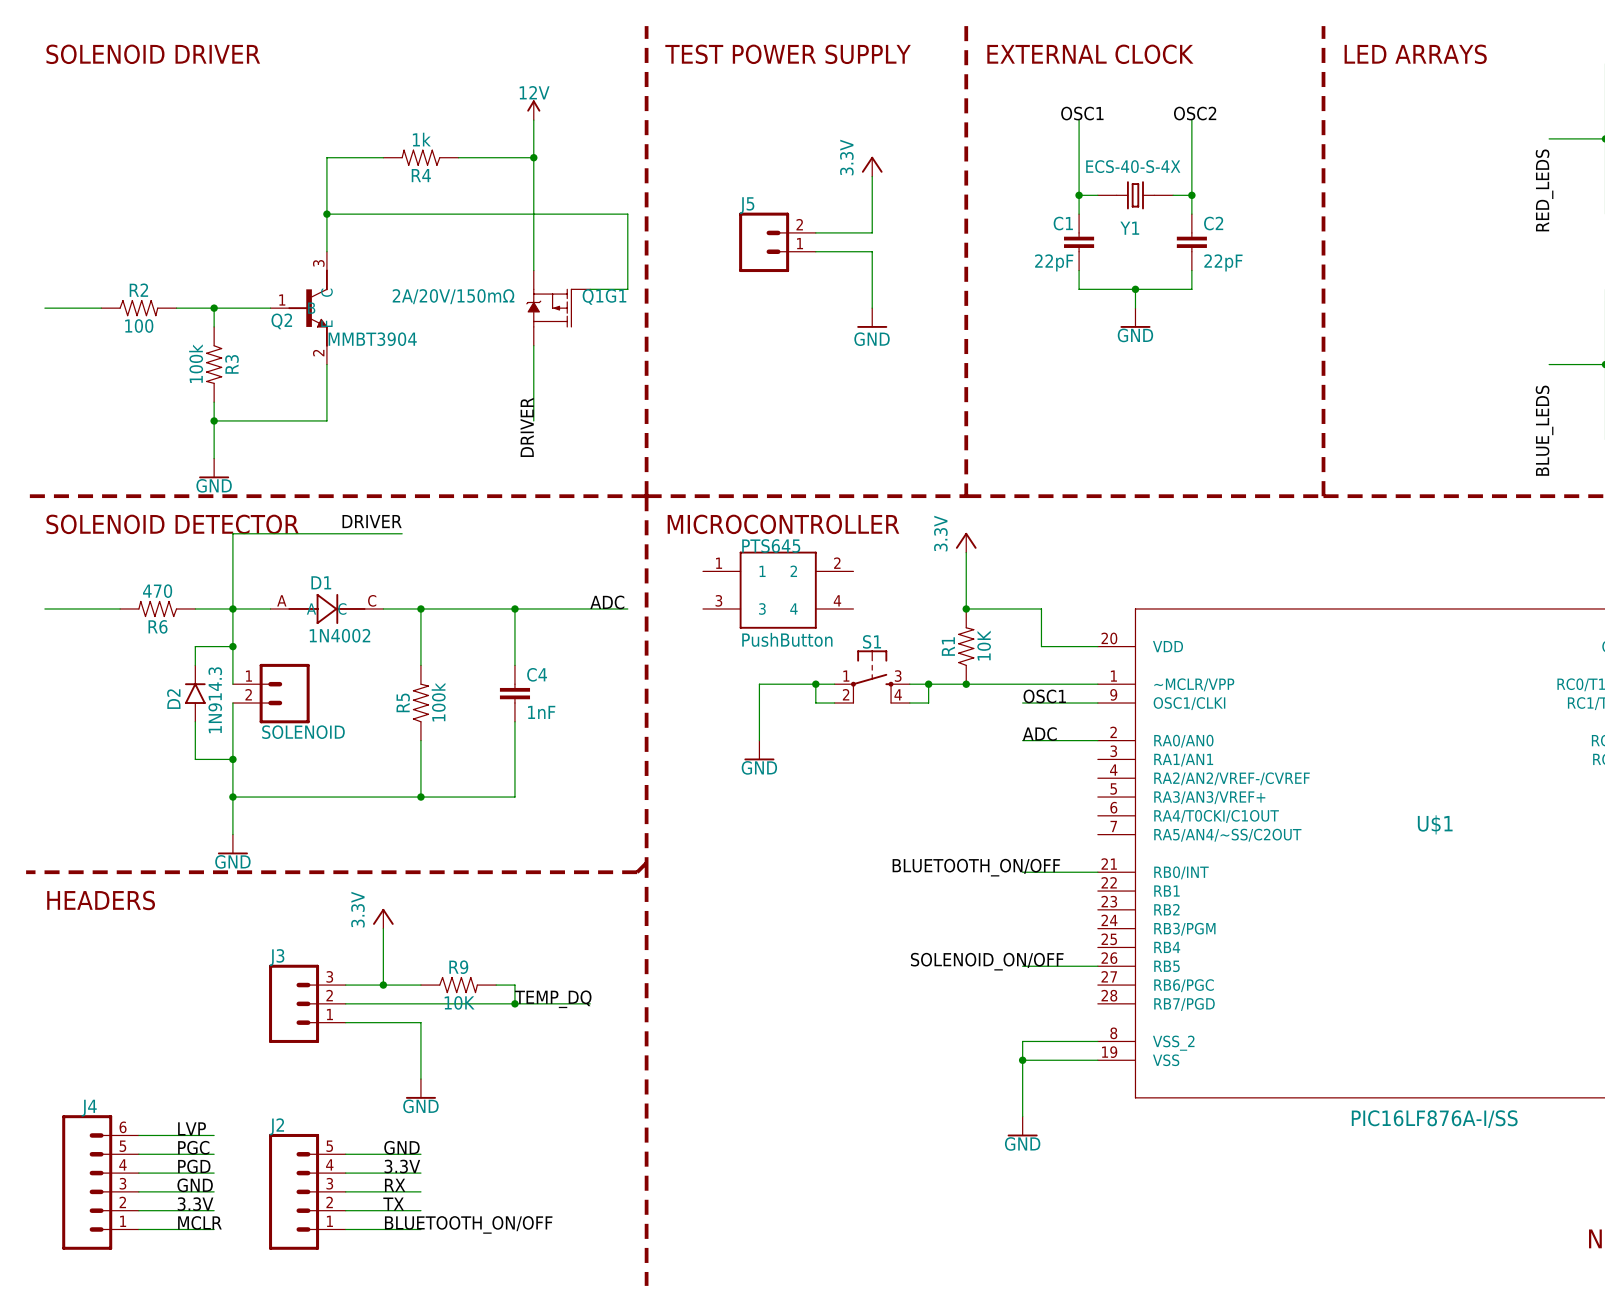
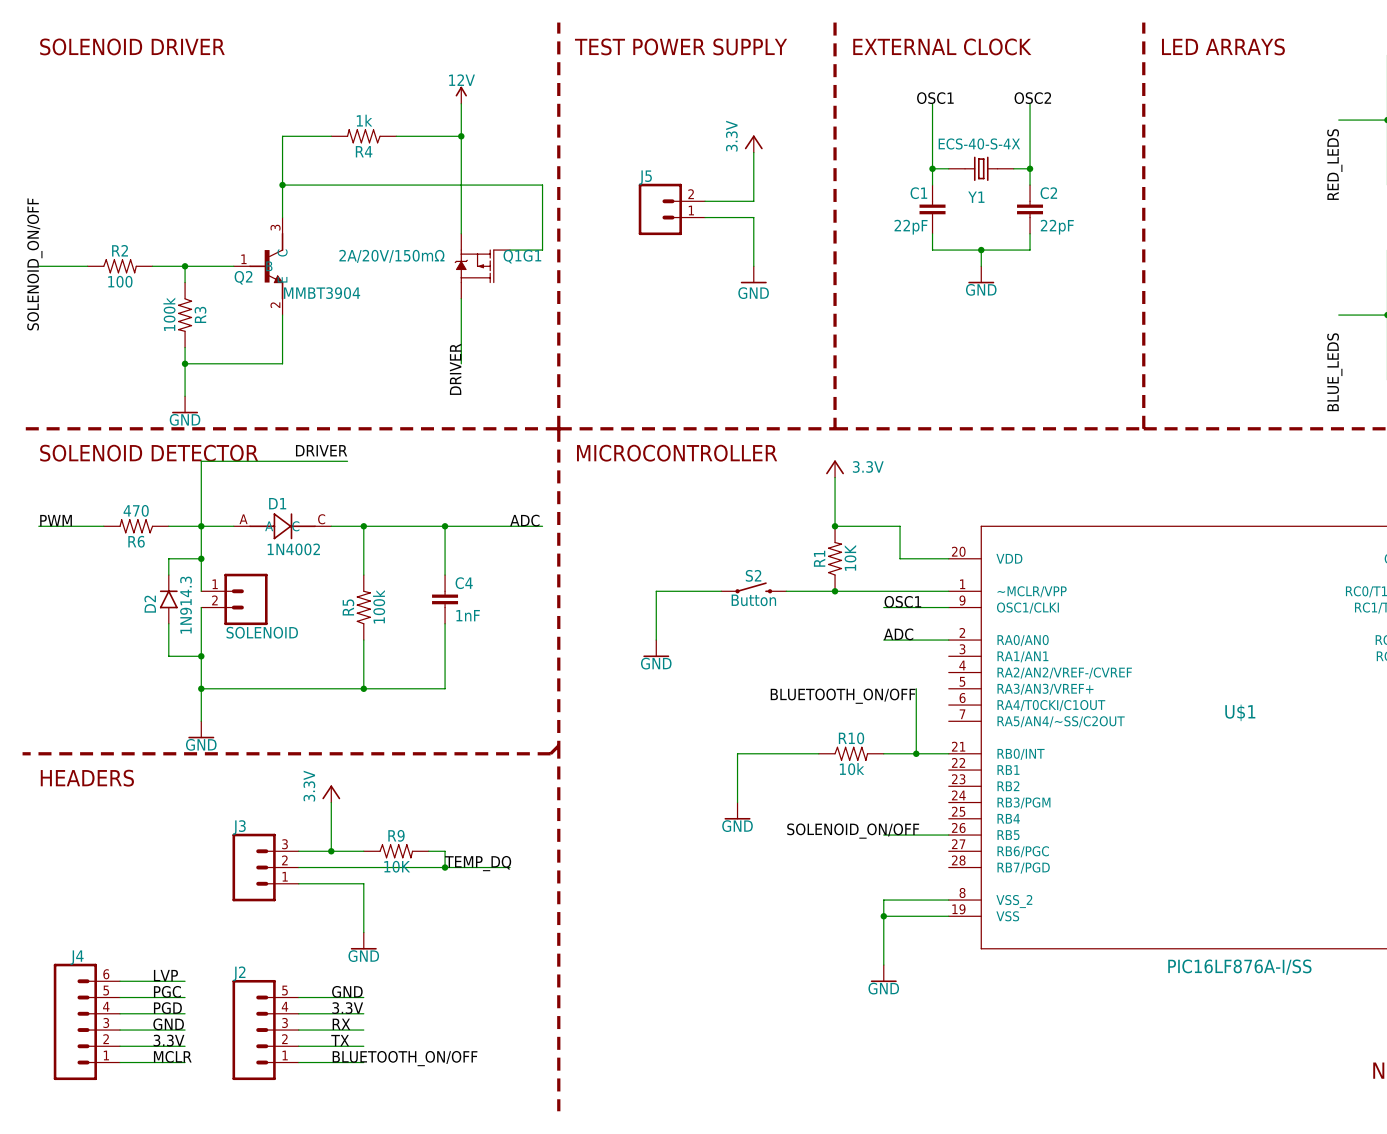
label: none -> SOLENOID_ON/OFF (34, 264)
power symbol text rotation: 0° (940, 533) -> 90° clockwise (868, 466)
power symbol text position: 3.3V (940, 533) -> 3.3V (868, 466)
part: (778, 590) -> none
label: none -> PWM (56, 520)
S1: (872, 676) -> none
S2: none -> Button (753, 587)
wire: (815, 684) (815, 703) (834, 703) -> none
junction: (815, 684) -> none
wire: (928, 684) (928, 703) (909, 703) -> none
junction: (928, 684) -> none
wire: none -> (916, 688) (916, 753)
label: none -> BLUETOOTH_ON/OFF (843, 696)
label: BLUETOOTH_ON/OFF (976, 867) -> none
wire: none -> (818, 753) (737, 753) (737, 802)
R10: none -> 10k (851, 753)
junction: none -> (916, 753)
power symbol: none -> GND (737, 811)

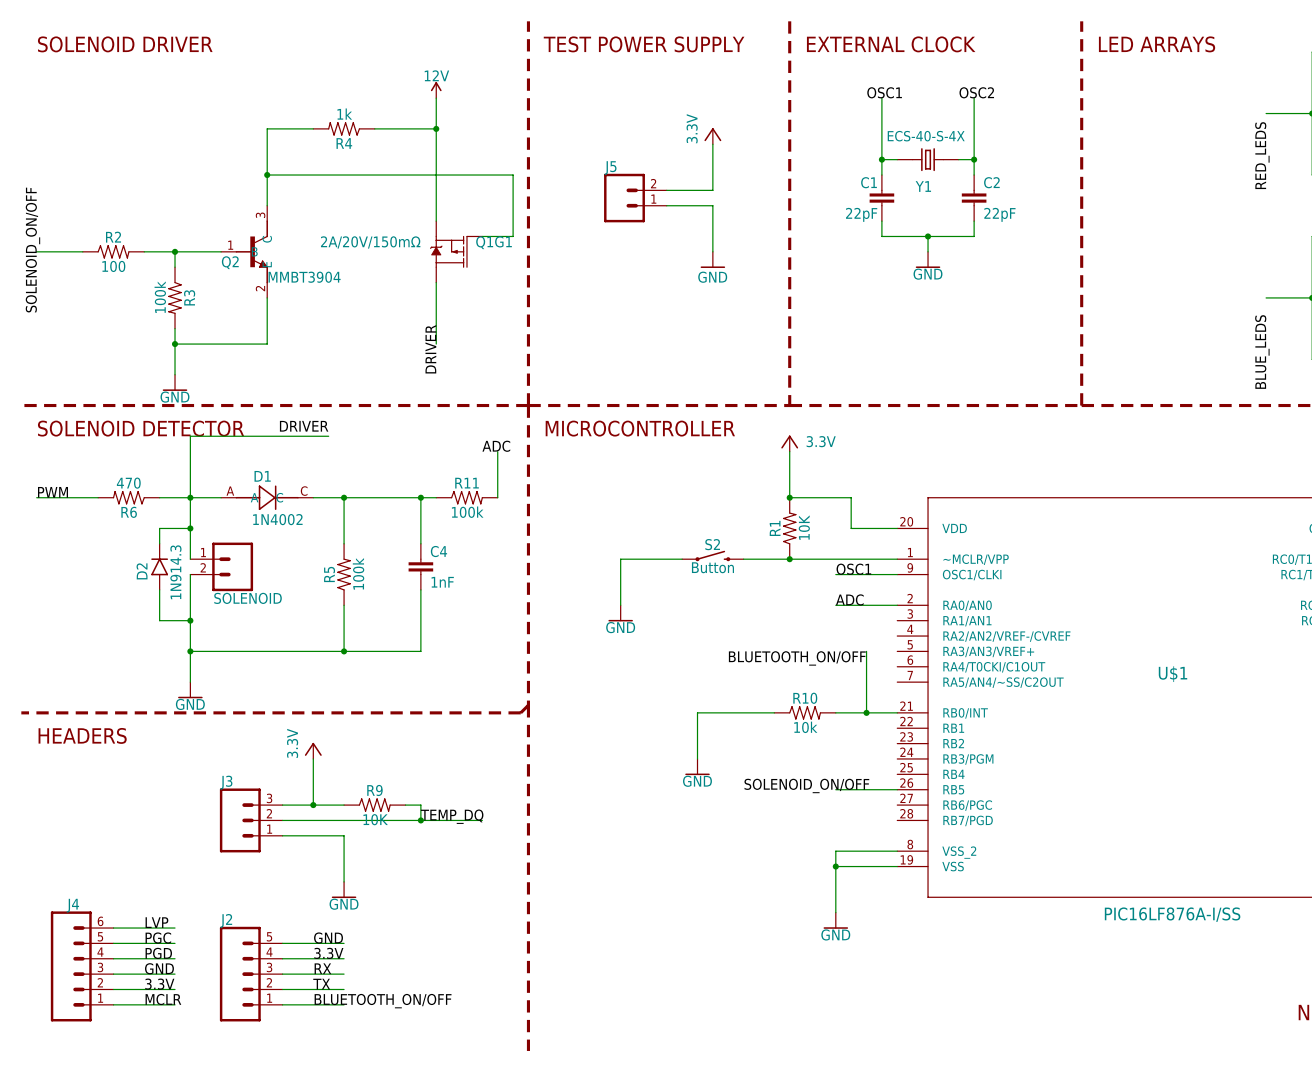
wire: none -> (497, 451) (497, 497)
label position: ADC (524, 520) -> ADC (496, 446)
R11: none -> 100k (466, 497)

